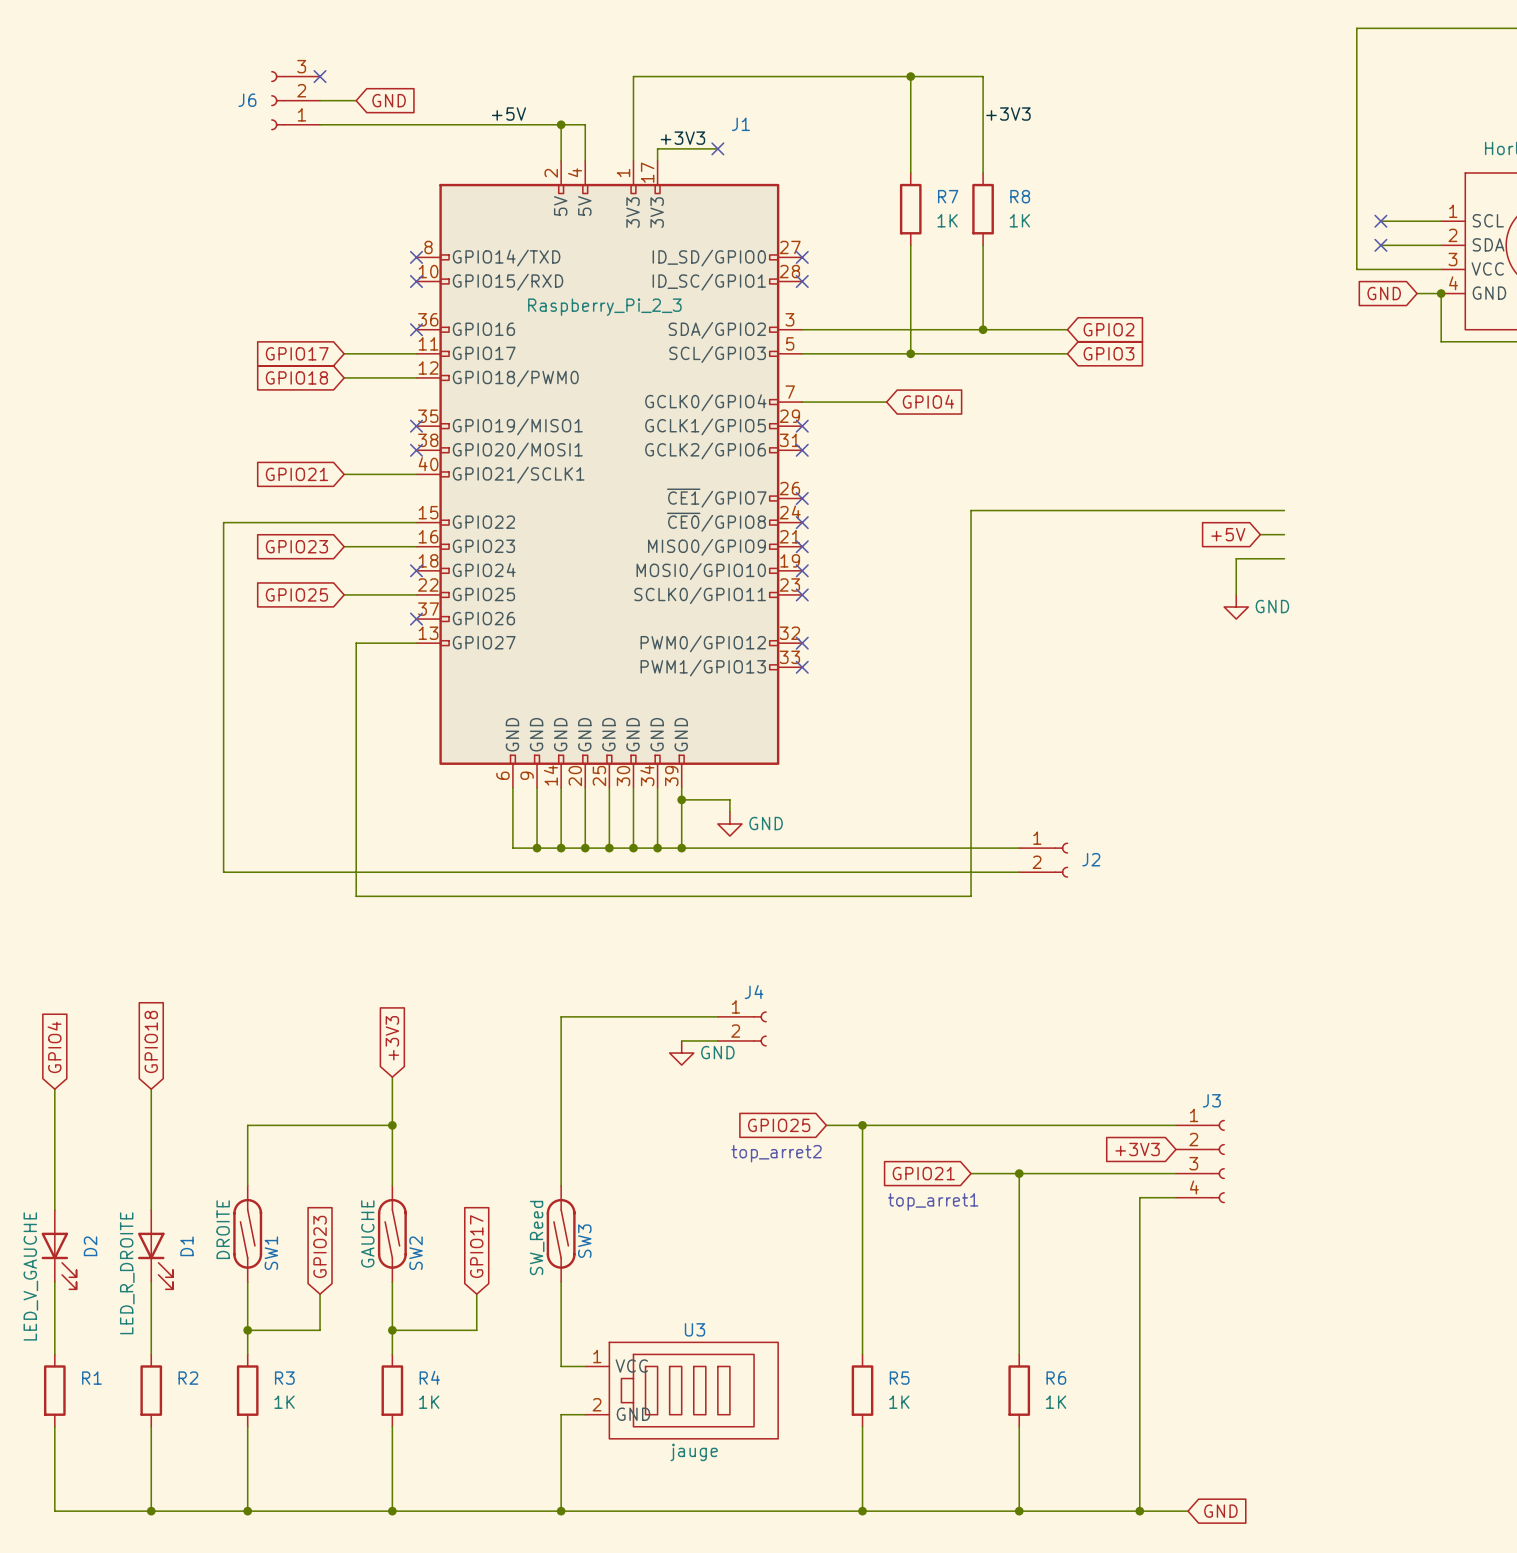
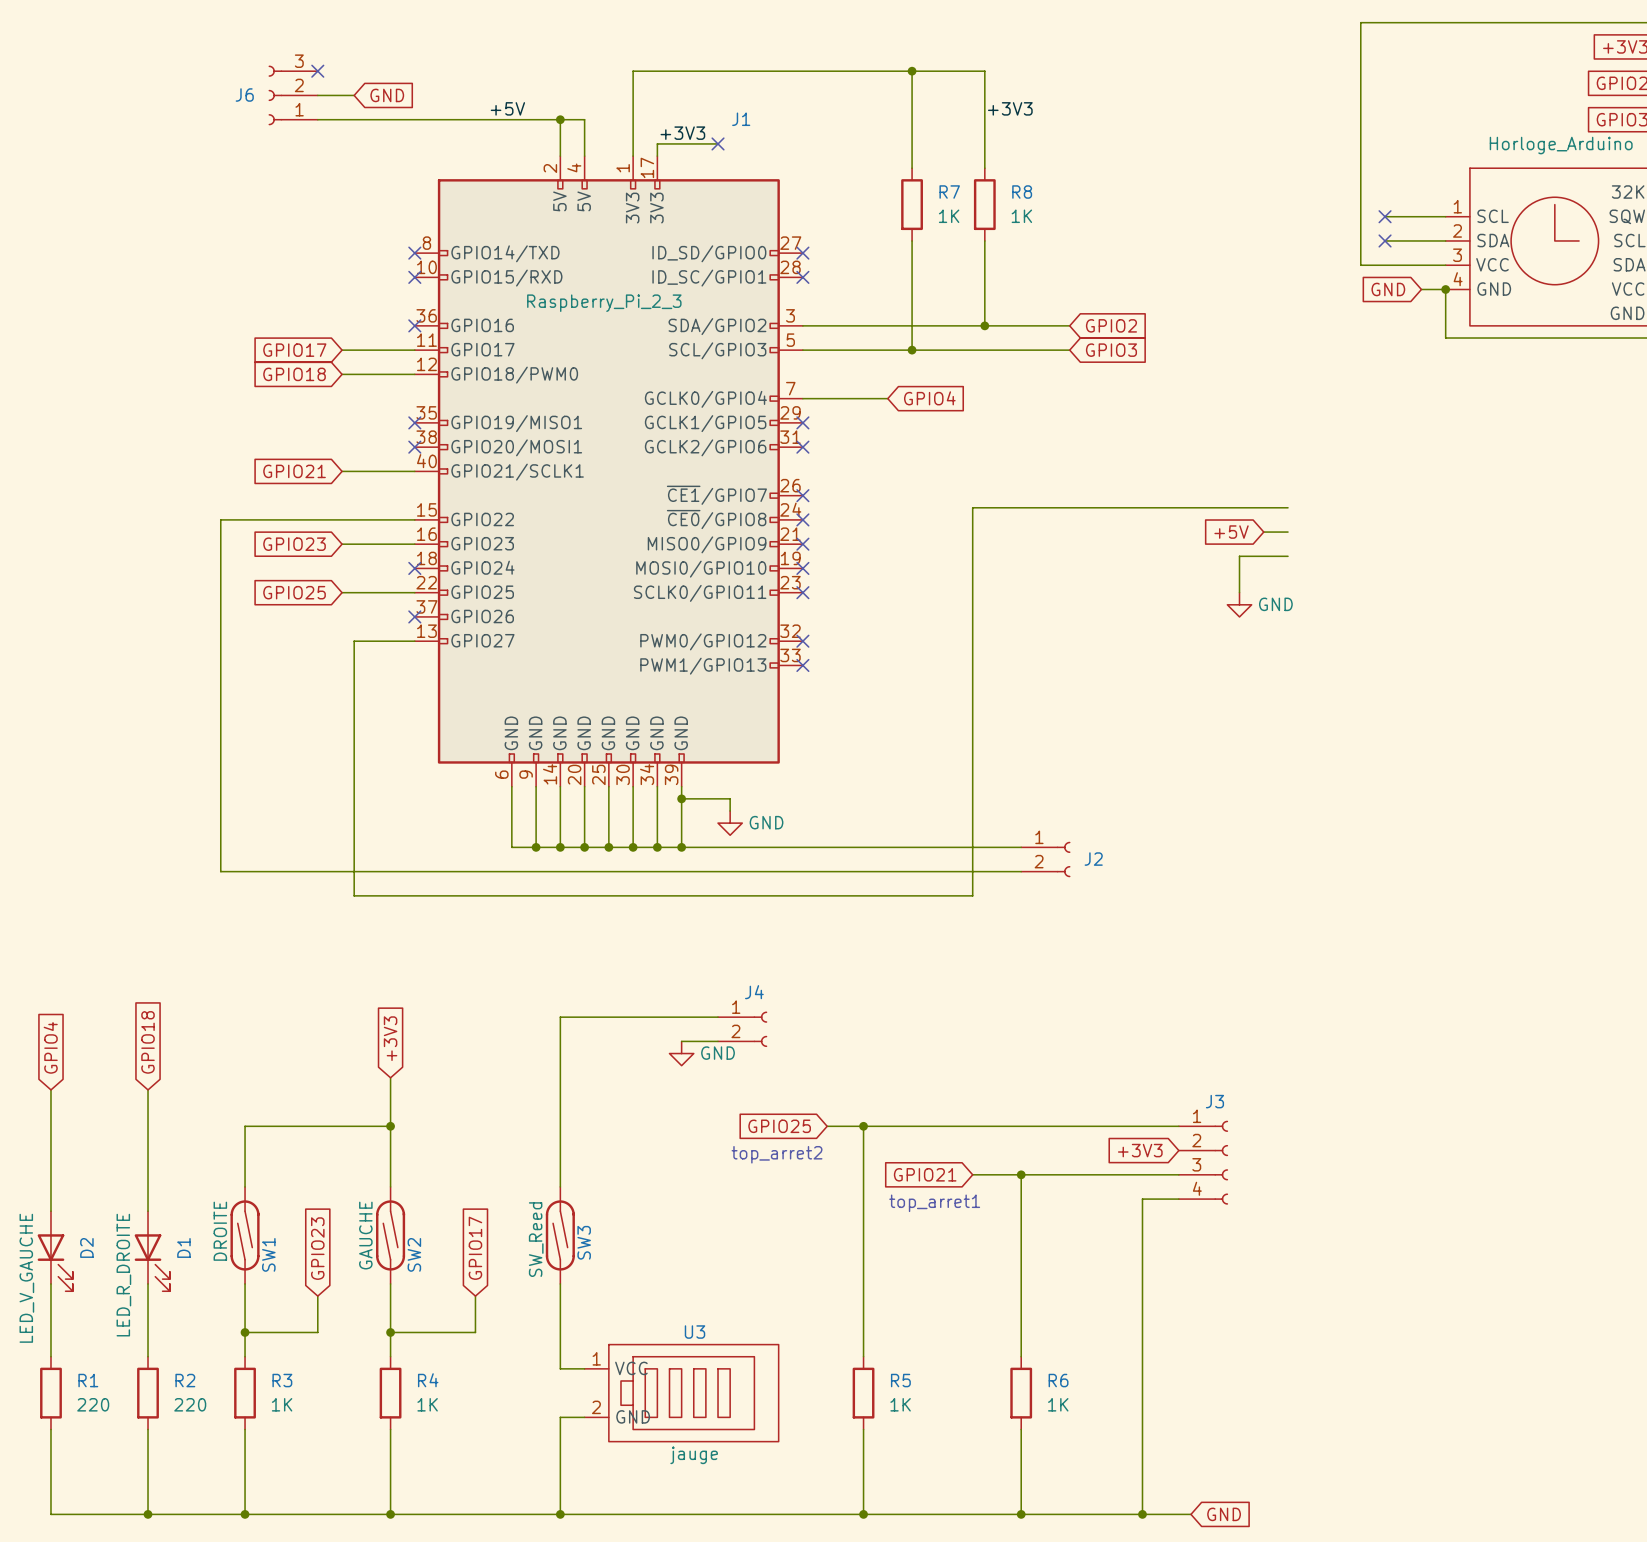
R1 value: none -> 220 (93, 1404)
R2 value: none -> 220 (190, 1404)

